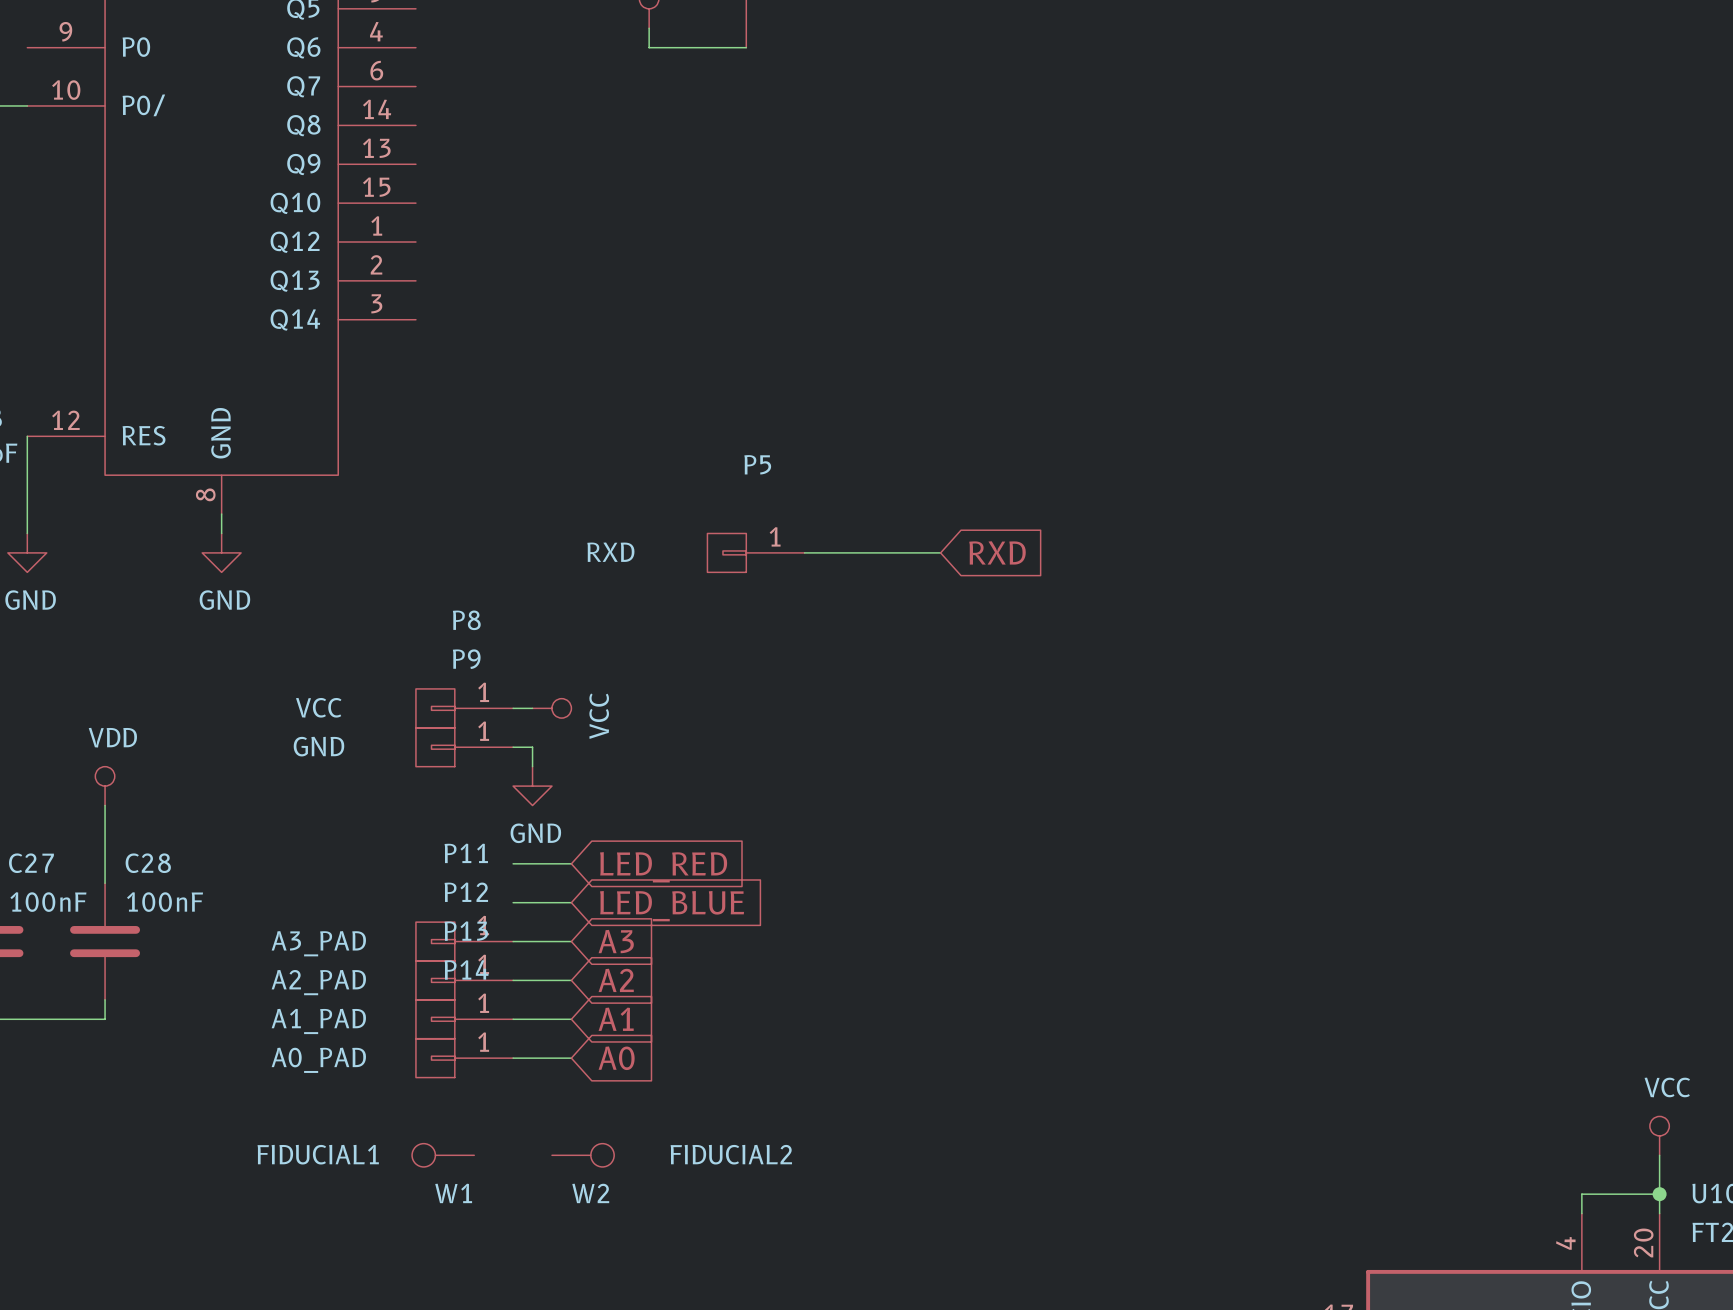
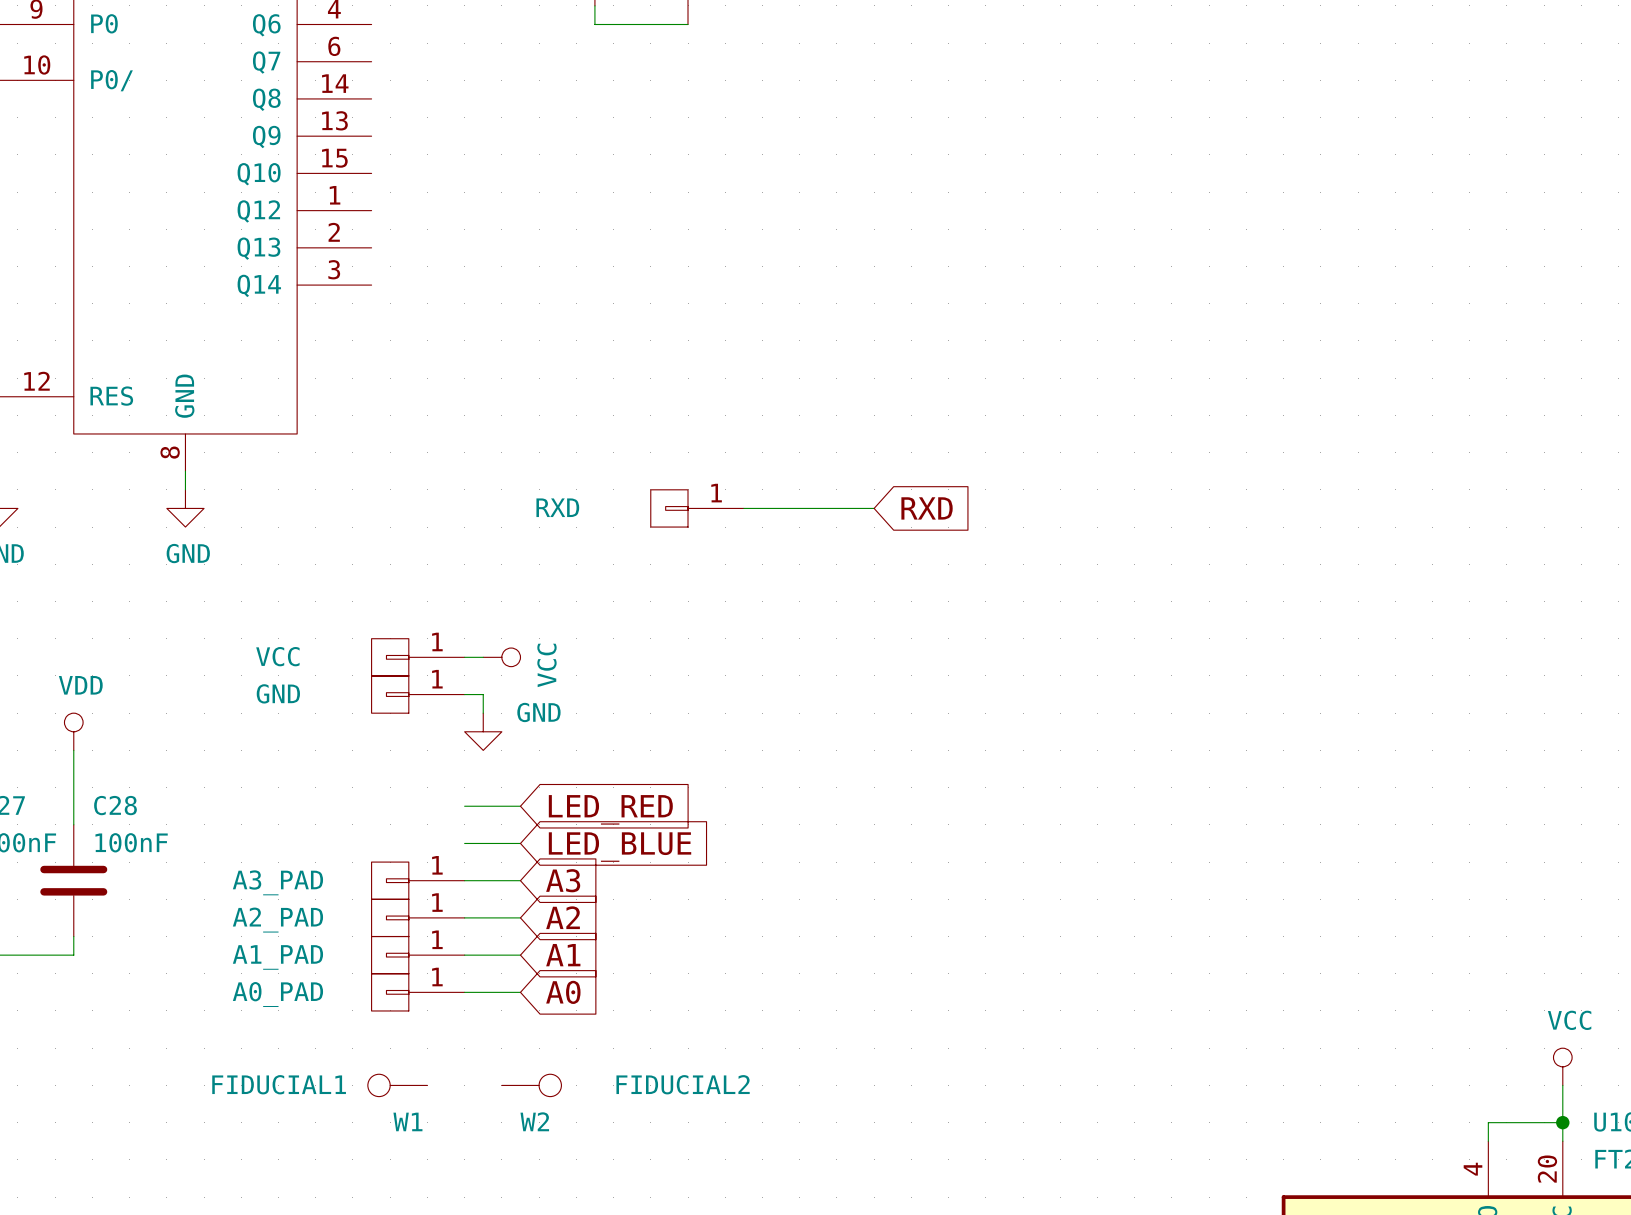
P5 name: P5 (757, 464) -> none
P8 name: P8 (466, 620) -> none
P9 name: P9 (466, 659) -> none
power symbol text position: GND (535, 833) -> GND (538, 712)
P11 name: P11 (466, 853) -> none
P12 name: P12 (466, 892) -> none
P13 name: P13 (466, 931) -> none
P14 name: P14 (466, 969) -> none

